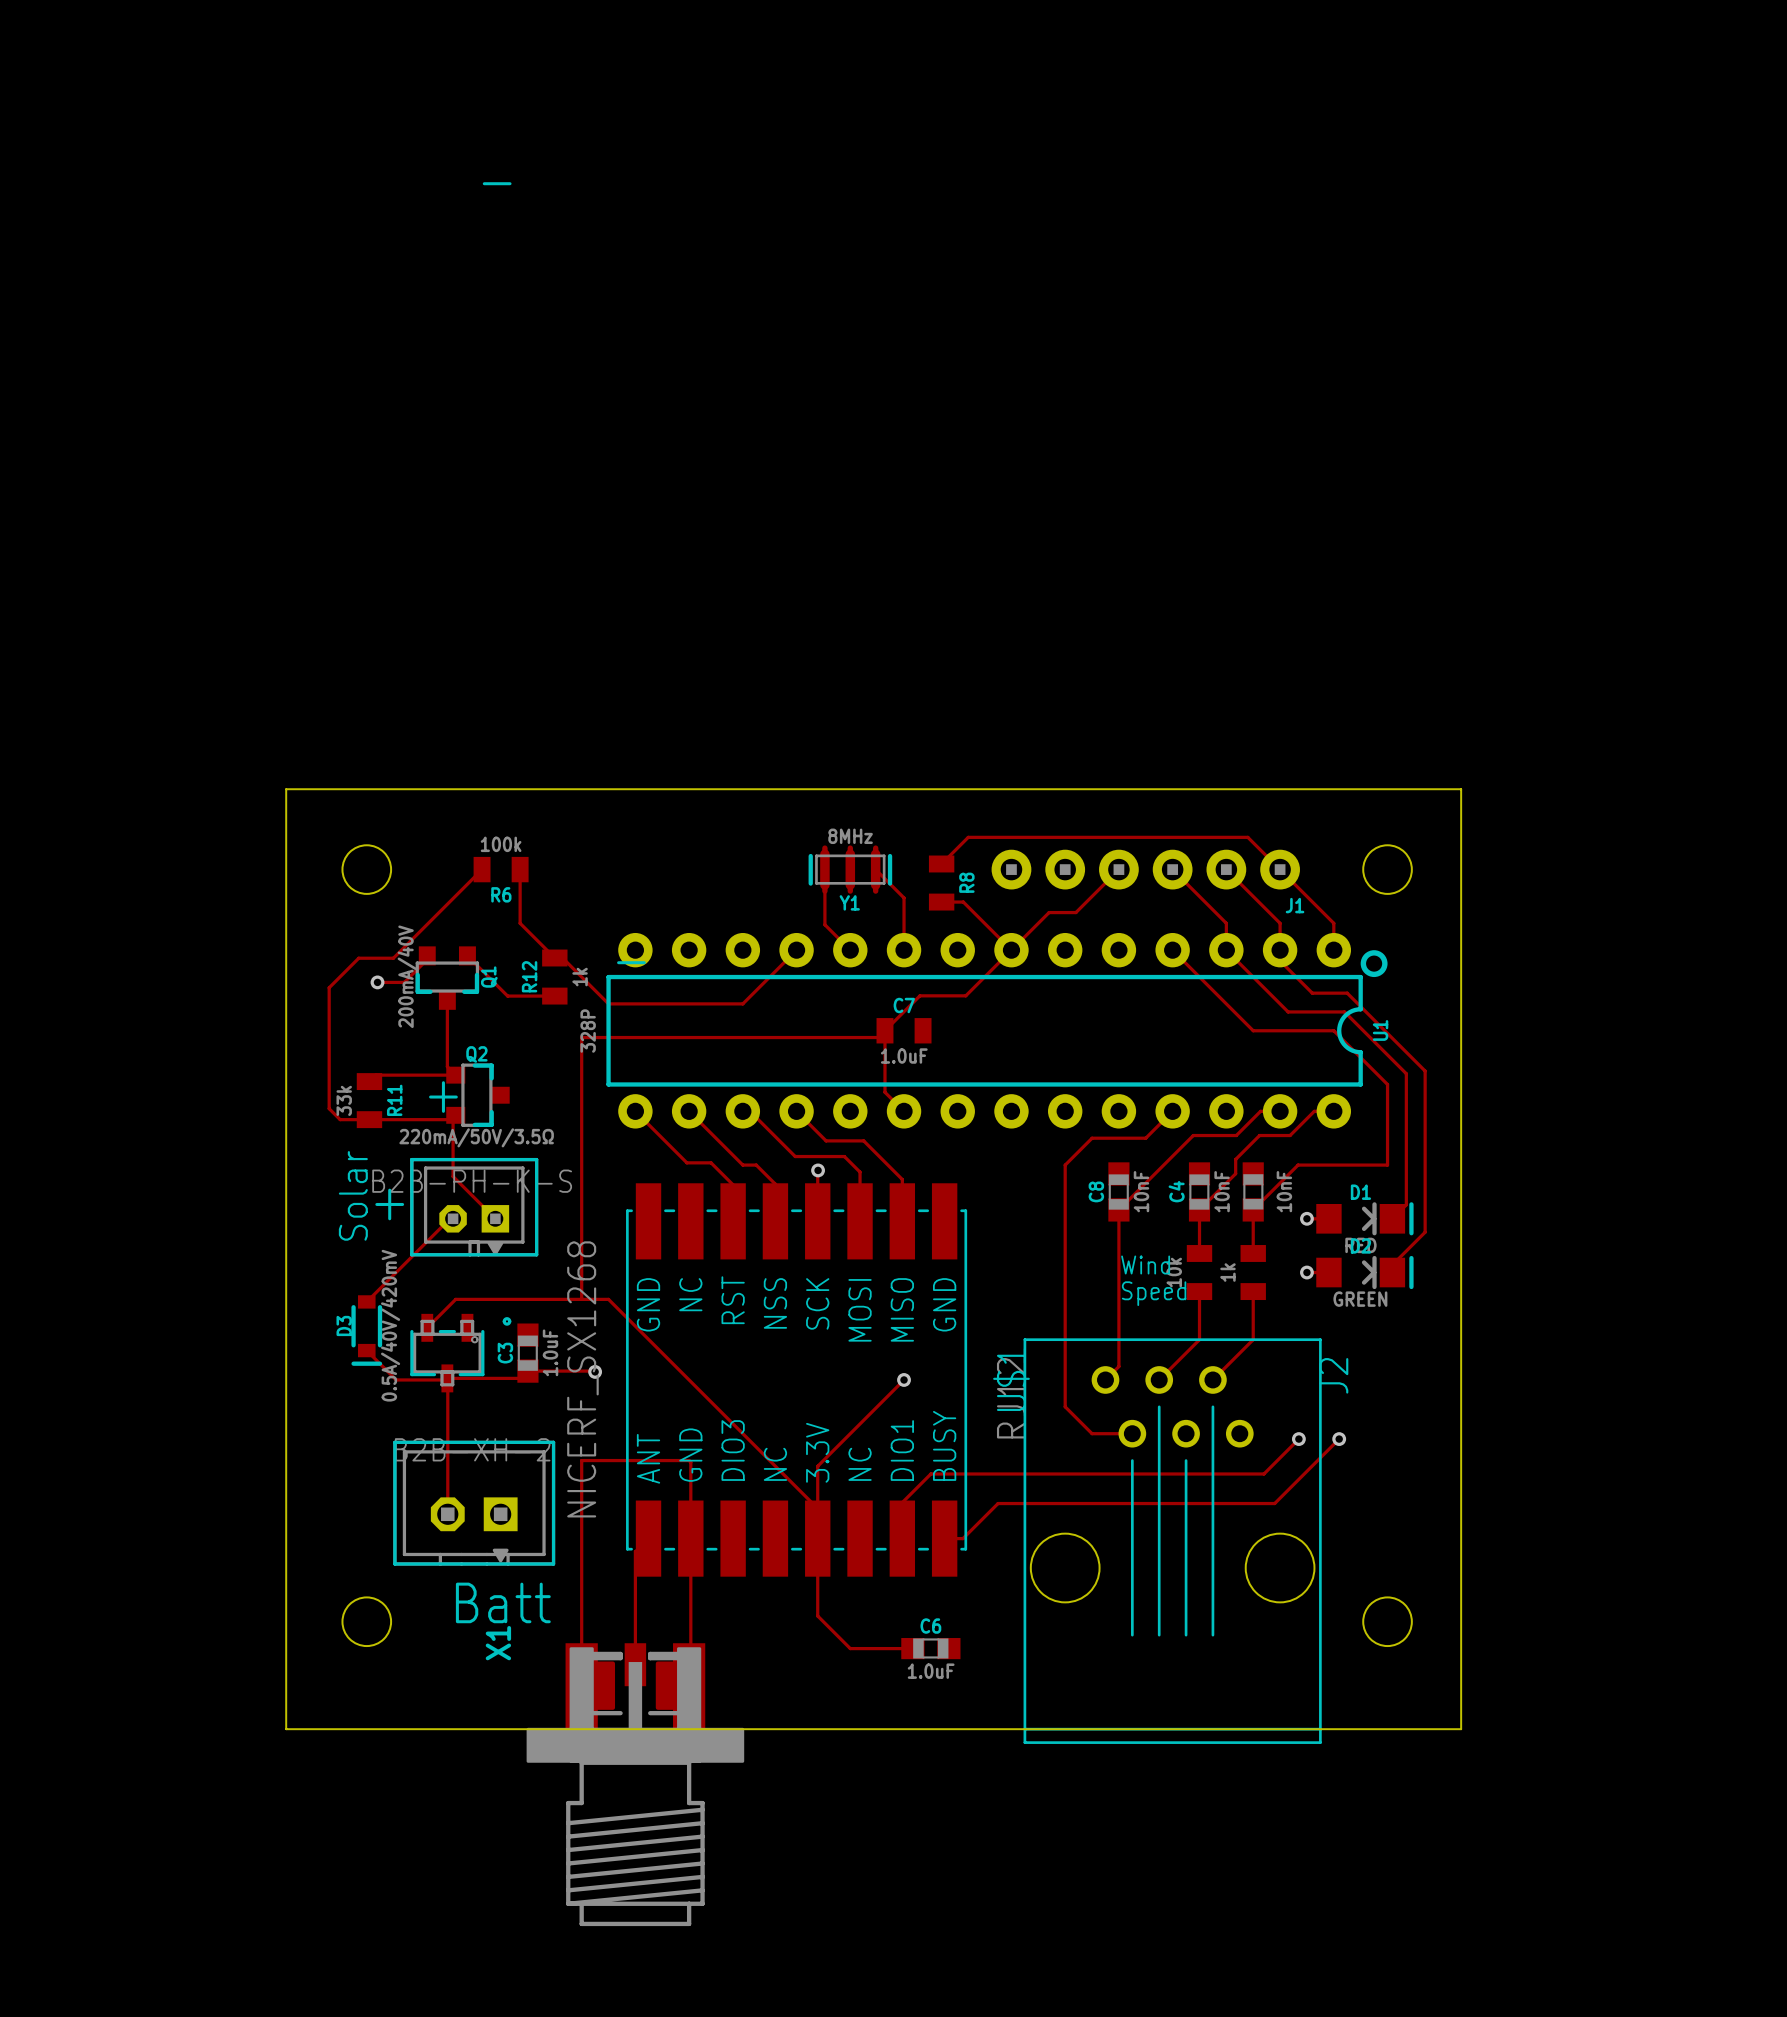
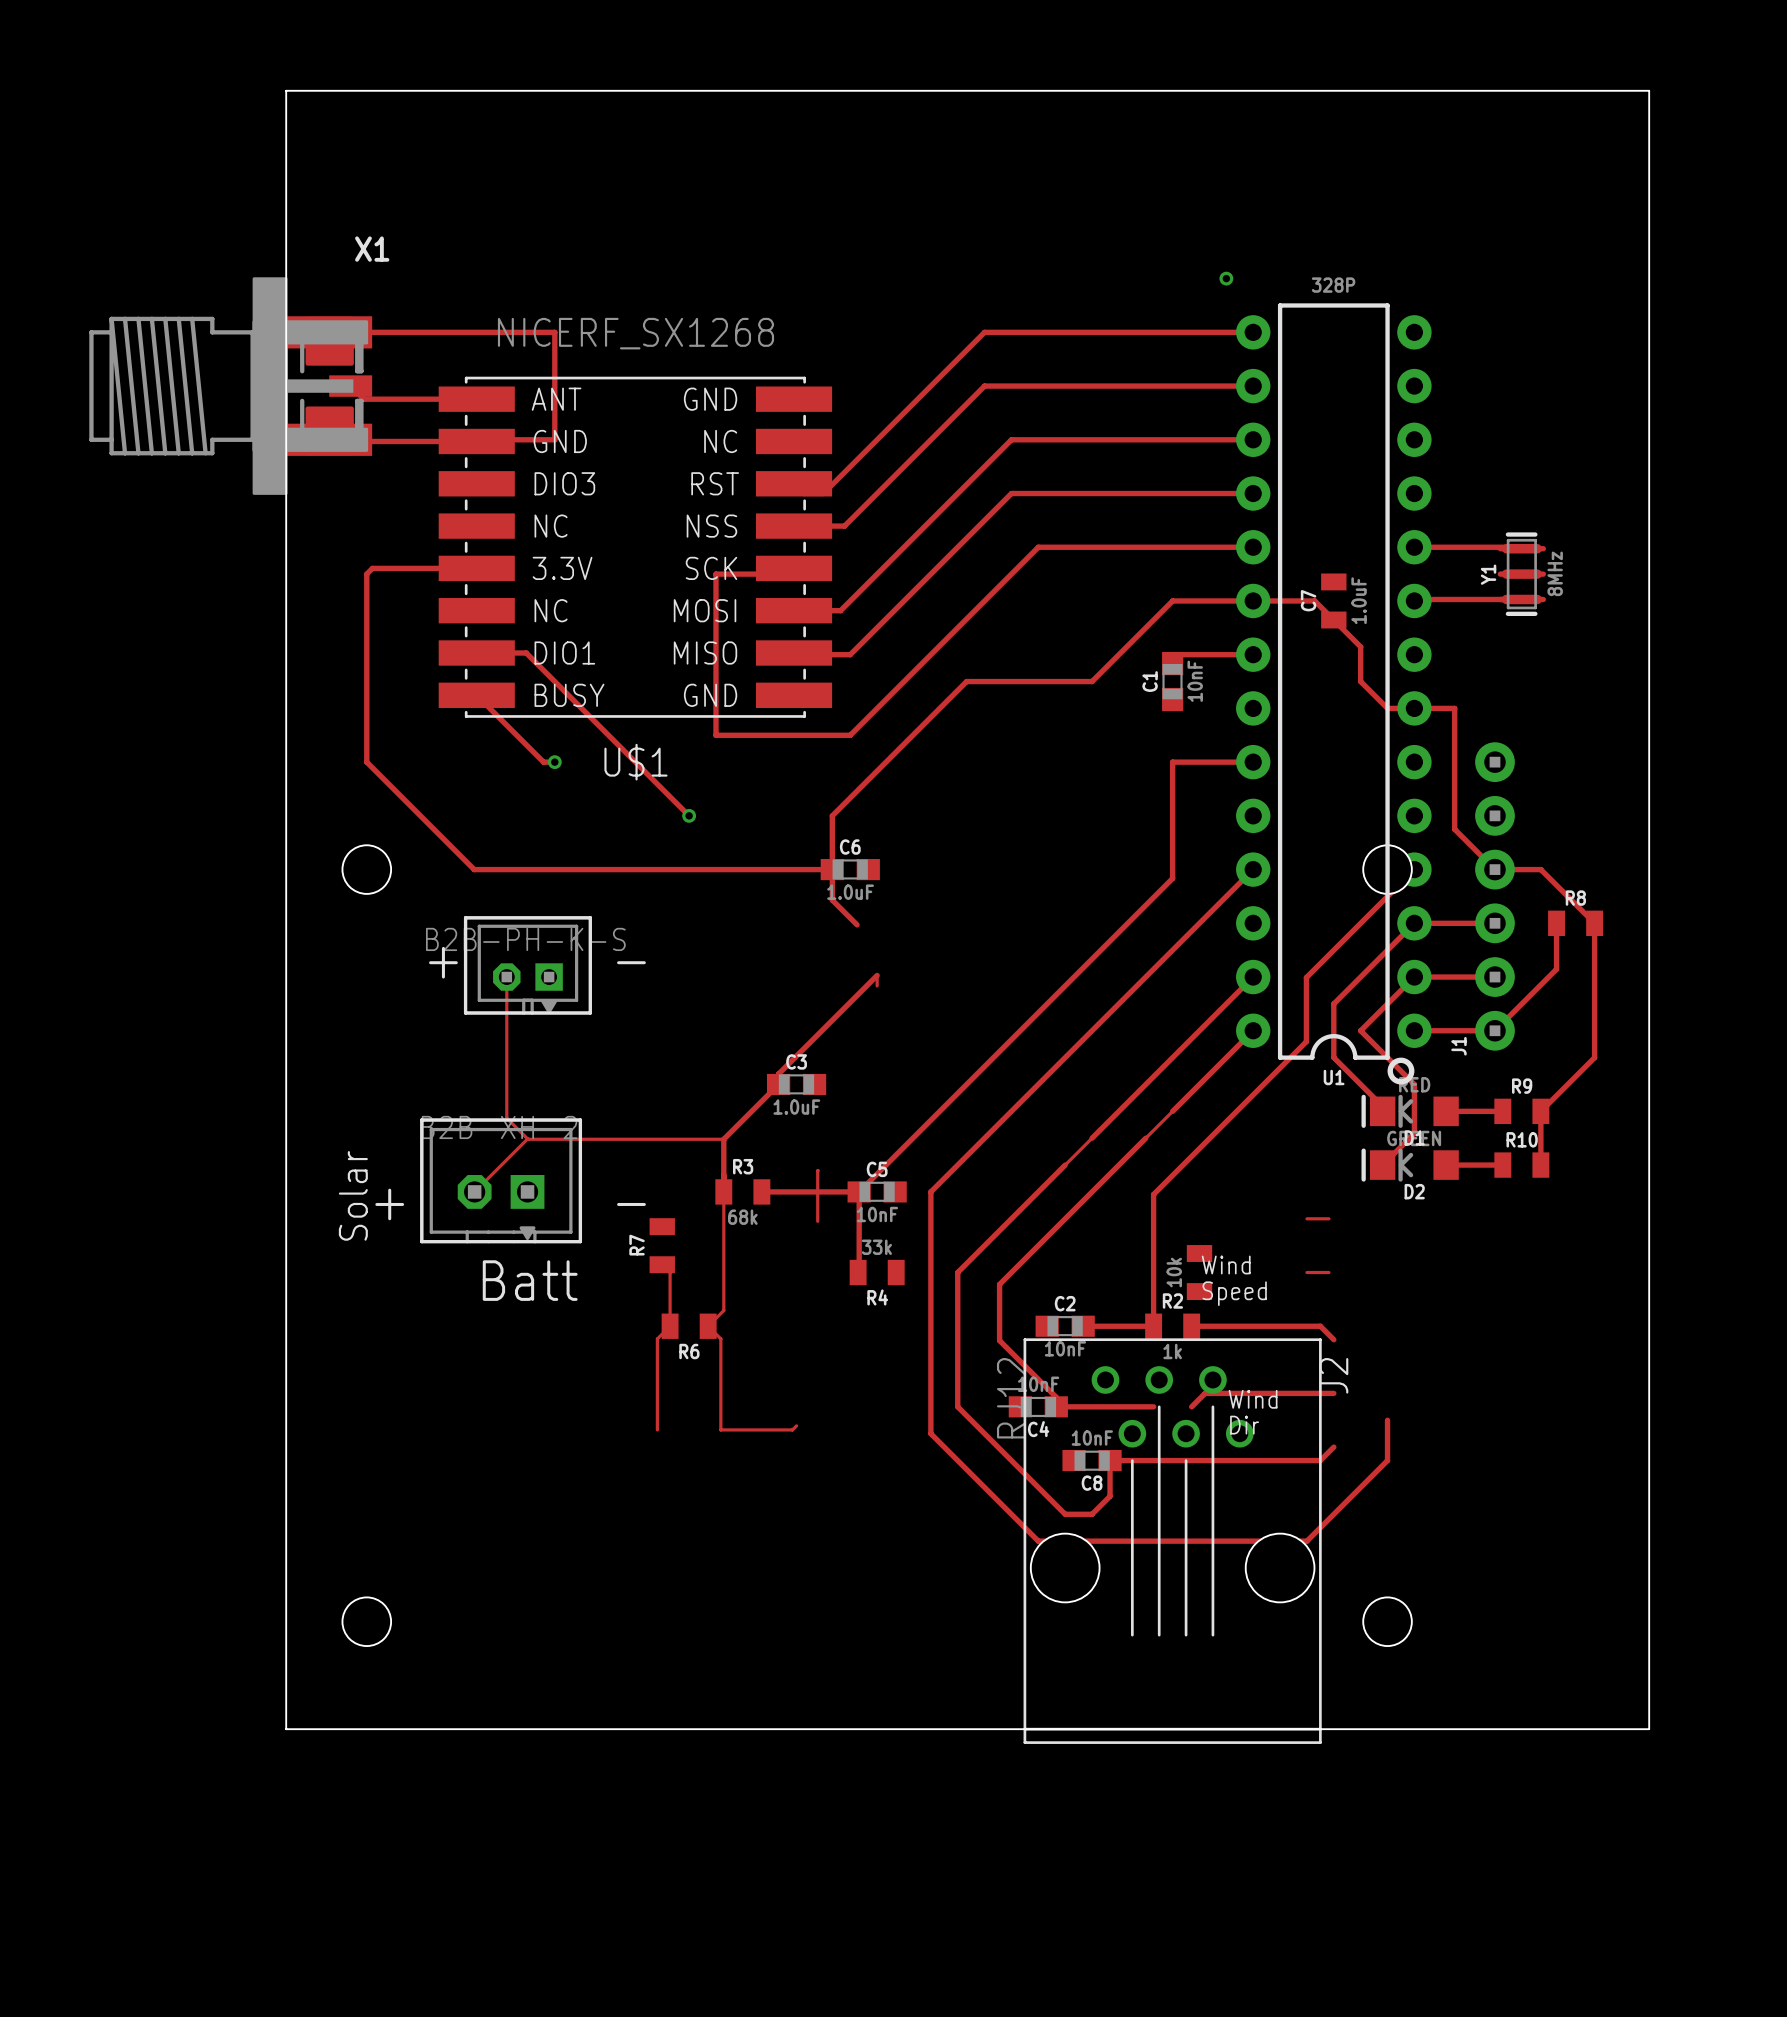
text: - (497, 183) -> none
via: none -> (1226, 278)
track: none -> (329, 332) (554, 332) (554, 439) (478, 439) (476, 441) (330, 441) (329, 439)
track: none -> (1253, 332) (984, 332) (823, 493) (803, 493) (794, 483)
track: none -> (350, 386) (363, 399) (476, 399)
track: none -> (1253, 386) (984, 386) (844, 526) (794, 526)
track: none -> (1253, 439) (1011, 439) (840, 610) (794, 610)
track: none -> (1253, 493) (1011, 493) (850, 654) (795, 654) (794, 653)
track: none -> (1253, 547) (1038, 547) (850, 735) (715, 735) (715, 574) (788, 574) (794, 568)
track: none -> (1414, 547) (1521, 548)
track: none -> (476, 568) (372, 568) (366, 574) (366, 762) (474, 869) (832, 869)
track: none -> (1521, 599) (1414, 600)
track: none -> (476, 653) (526, 653) (689, 815)
track: none -> (1253, 654) (1181, 654) (1172, 663)
C1: none -> 10nF (1172, 681)
track: none -> (476, 695) (543, 762) (554, 762)
via: none -> (554, 762)
track: none -> (1253, 762) (1172, 762) (1172, 878) (859, 1191)
board edge: (286, 789) (1461, 789) (1461, 1729) -> (286, 789) (286, 90) (1649, 90) (1649, 1729) (1461, 1729)
via: none -> (689, 815)
R6 value: 100k (501, 844) -> none
track: (941, 863) (968, 837) (1247, 837) (1333, 923) (1333, 950) -> none
track: (482, 869) (393, 958) (358, 958) (329, 987) (329, 1108) (340, 1119) (455, 1119) (455, 1115) -> none
R6 position: (501, 869) -> (689, 1326)
track: (520, 869) (520, 923) (554, 958) (562, 958) (608, 1003) (742, 1003) (796, 950) -> none
track: (824, 869) (824, 924) (850, 950) -> none
Y1 rotation: 0° (850, 869) -> 90° clockwise (1521, 574)
Y1 position: (850, 869) -> (1521, 574)
track: (875, 869) (904, 897) (904, 950) -> none
track: (1118, 869) (1075, 912) (1049, 912) (965, 995) (919, 995) (878, 1037) (581, 1037) (581, 1299) -> none
J1 rotation: 0° (1145, 869) -> 90° clockwise (1494, 896)
J1 position: (1145, 869) -> (1494, 896)
track: (1172, 869) (1226, 923) (1226, 950) (1288, 1011) (1344, 1011) (1406, 1073) (1406, 1204) (1392, 1218) -> none
track: (1226, 869) (1280, 923) (1280, 960) (1312, 993) (1347, 993) (1425, 1071) (1425, 1232) (1392, 1264) (1392, 1272) -> none
track: none -> (1253, 869) (930, 1191) (930, 1433) (1038, 1541) (1306, 1541) (1387, 1460) (1387, 1420)
track: none -> (1414, 869) (1306, 977) (1306, 1041) (1153, 1194) (1153, 1326) (1083, 1326)
R8 rotation: 0° (941, 883) -> 90° clockwise (1575, 923)
R8 position: (941, 883) -> (1575, 923)
track: (941, 902) (963, 902) (1011, 950) -> none
track: none -> (1494, 923) (1414, 923) (1333, 1003) (1333, 1057) (1382, 1106) (1382, 1111)
track: none -> (1556, 923) (1556, 969) (1494, 1030) (1414, 1030)
track: none -> (857, 924) (832, 900) (832, 815) (966, 681) (1092, 681) (1172, 600) (1314, 600) (1360, 646) (1360, 681) (1387, 708) (1454, 708) (1454, 829) (1494, 869) (1540, 869) (1594, 923) (1594, 1057) (1540, 1111) (1540, 1165)
track: (1172, 950) (1253, 1030) (1333, 1030) (1387, 1084) (1387, 1165) (1298, 1165) (1253, 1209) (1253, 1253) -> none
track: (427, 955) (427, 959) (404, 982) (377, 982) -> none
track: (467, 955) (507, 996) (554, 996) -> none
track: none -> (506, 977) (506, 1118) (527, 1139)
R12: 1k (554, 977) -> none
track: none -> (1494, 977) (1414, 977) (1360, 1030) (1414, 1084) (1414, 1133) (1382, 1165)
Q1: 200mA/40V (447, 978) -> none
via: (377, 982) -> none
track: none -> (877, 985) (877, 975) (778, 1074) (778, 1084) (723, 1139)
track: (447, 1000) (447, 1066) (455, 1075) (375, 1075) (369, 1081) -> none
track: (884, 1030) (884, 1092) (904, 1111) -> none
C7 rotation: 0° (904, 1030) -> 90° clockwise (1333, 600)
C7 position: (904, 1030) -> (1333, 600)
U1 rotation: 0° (996, 1030) -> 90° clockwise (1333, 693)
U1 position: (996, 1030) -> (1333, 693)
track: none -> (1253, 1030) (1172, 1111)
Q2: 220mA/50V/3.5Ω (477, 1095) -> none
text position: + (443, 1097) -> + (443, 962)
R11: 33k (369, 1100) -> none
track: (635, 1111) (686, 1162) (711, 1162) (733, 1184) (733, 1221) -> none
track: (689, 1111) (742, 1165) (756, 1165) (775, 1183) (775, 1221) -> none
track: (742, 1111) (750, 1111) (795, 1156) (844, 1156) (860, 1172) (860, 1221) -> none
track: (796, 1111) (826, 1140) (863, 1140) (902, 1179) (902, 1221) -> none
track: (1280, 1111) (1260, 1111) (1236, 1135) (1193, 1135) (1118, 1209) (1118, 1366) (1105, 1379) -> none
track: (1333, 1111) (1314, 1111) (1290, 1135) (1259, 1135) (1235, 1159) (1235, 1173) (1199, 1209) (1199, 1253) -> none
track: none -> (1446, 1111) (1502, 1111)
R9: none -> (1521, 1111)
track: (453, 1119) (453, 1176) (495, 1218) -> none
track: (1092, 1138) (1145, 1138) -> (1092, 1138) (1253, 977)
track: none -> (1145, 1138) (999, 1284) (999, 1340) (1056, 1397) (1056, 1406) (1153, 1406)
track: none -> (723, 1139) (723, 1310) (708, 1326) (720, 1338) (720, 1429) (792, 1429) (796, 1425)
track: none -> (723, 1139) (527, 1139) (474, 1191)
track: (1065, 1165) (1065, 1406) (1092, 1433) (1132, 1433) -> (1065, 1165) (957, 1272) (957, 1406) (1065, 1514) (1092, 1514) (1110, 1496) (1110, 1460) (1320, 1460) (1333, 1447)
track: none -> (1446, 1165) (1502, 1165)
R10: none -> (1521, 1165)
via: (818, 1170) -> none
R3: none -> 68k (742, 1191)
track: none -> (761, 1191) (859, 1191)
track: none -> (859, 1191) (858, 1272)
C5: none -> 10nF (877, 1191)
C8 rotation: 0° (1118, 1191) -> 90° clockwise (1092, 1460)
C8 position: (1118, 1191) -> (1092, 1460)
C4 rotation: 0° (1199, 1191) -> 90° clockwise (1038, 1406)
C4 position: (1199, 1191) -> (1038, 1406)
part: 10nF (1253, 1191) -> none
text: none -> - (631, 1204)
part position: (474, 1207) -> (527, 965)
track: (453, 1218) (449, 1218) (366, 1301) -> none
via: (1306, 1218) -> none
D1 rotation: 0° (1364, 1218) -> 180° (1410, 1111)
D1 position: (1364, 1218) -> (1410, 1111)
R7: none -> (662, 1245)
track: none -> (662, 1264) (670, 1272) (670, 1326) (657, 1338) (657, 1429)
text position: Wind (1145, 1265) -> Wind (1226, 1265)
R4: none -> 33k (877, 1272)
part: 1k (1253, 1272) -> none
via: (1306, 1272) -> none
D2 rotation: 0° (1364, 1272) -> 180° (1410, 1165)
D2 position: (1364, 1272) -> (1410, 1165)
track: (1199, 1291) (1199, 1339) (1159, 1379) -> none
track: (1253, 1291) (1253, 1339) (1212, 1379) -> none
text position: Speed (1154, 1293) -> Speed (1234, 1293)
C2: none -> 10nF (1065, 1326)
R2: none -> 1k (1172, 1326)
track: none -> (1191, 1326) (1320, 1326) (1333, 1339)
track: (427, 1327) (455, 1299) (608, 1299) (821, 1512) (821, 1542) (817, 1538) -> none
D3: 0.5A/40V/420mV (366, 1330) -> none
track: (366, 1350) (396, 1379) (447, 1379) -> none
part: (460, 1353) -> none
C3 rotation: 0° (527, 1353) -> 90° clockwise (796, 1084)
C3 position: (527, 1353) -> (796, 1084)
track: (595, 1371) (527, 1371) (520, 1378) (447, 1378) (447, 1514) -> none
via: (595, 1371) -> none
U$1 rotation: 0° (796, 1379) -> 90° clockwise (635, 547)
U$1 position: (796, 1379) -> (635, 547)
track: (904, 1379) (817, 1466) (817, 1616) (850, 1648) (912, 1648) -> none
via: (904, 1379) -> none
track: none -> (1333, 1393) (1205, 1393) (1191, 1406)
text: none -> Wind (1253, 1399)
text: none -> Dir (1244, 1425)
track: (1298, 1439) (1263, 1473) (930, 1473) (902, 1502) (902, 1538) -> none
via: (1298, 1439) -> none
track: (1339, 1439) (1274, 1503) (998, 1503) (962, 1538) (944, 1538) -> none
via: (1339, 1439) -> none
part position: (474, 1503) -> (501, 1180)
track: (648, 1538) (635, 1551) (635, 1664) -> none
text position: Batt (503, 1602) -> Batt (530, 1280)
C6 position: (930, 1648) -> (850, 869)
track: (581, 1686) (581, 1460) (689, 1460) (690, 1462) (690, 1684) (689, 1686) -> none
X1 rotation: 0° (635, 1784) -> 90° clockwise (230, 386)
X1 position: (635, 1784) -> (230, 386)

